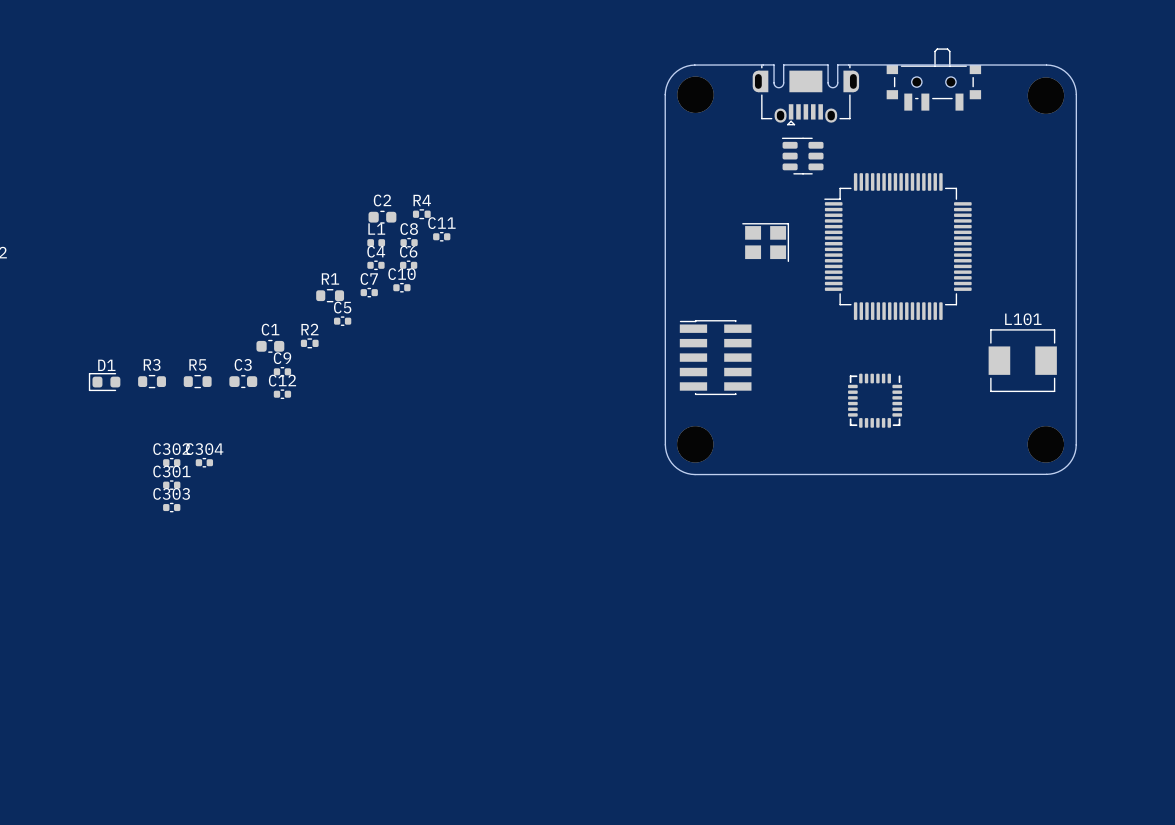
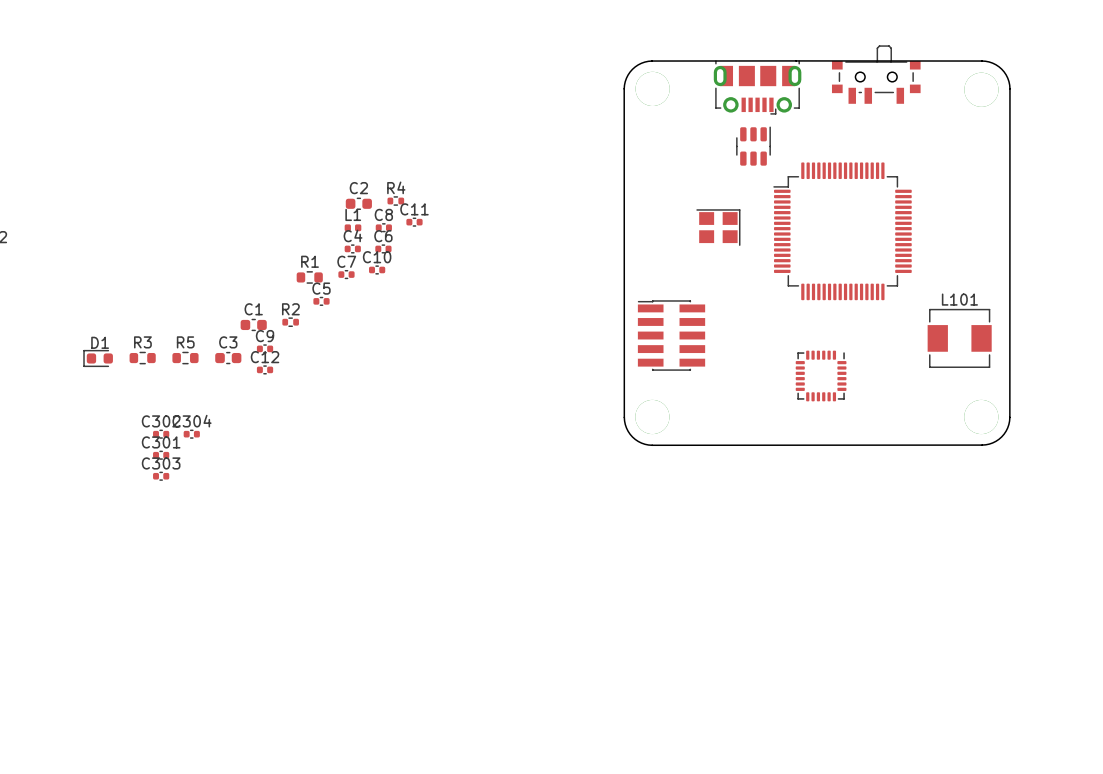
part footprint: [752, 64, 860, 126] -> [713, 60, 802, 115]
board edge: (763, 64) (694, 65) -> (796, 60) (651, 61)
part rotation: 0° (802, 156) -> 90° clockwise (753, 146)

